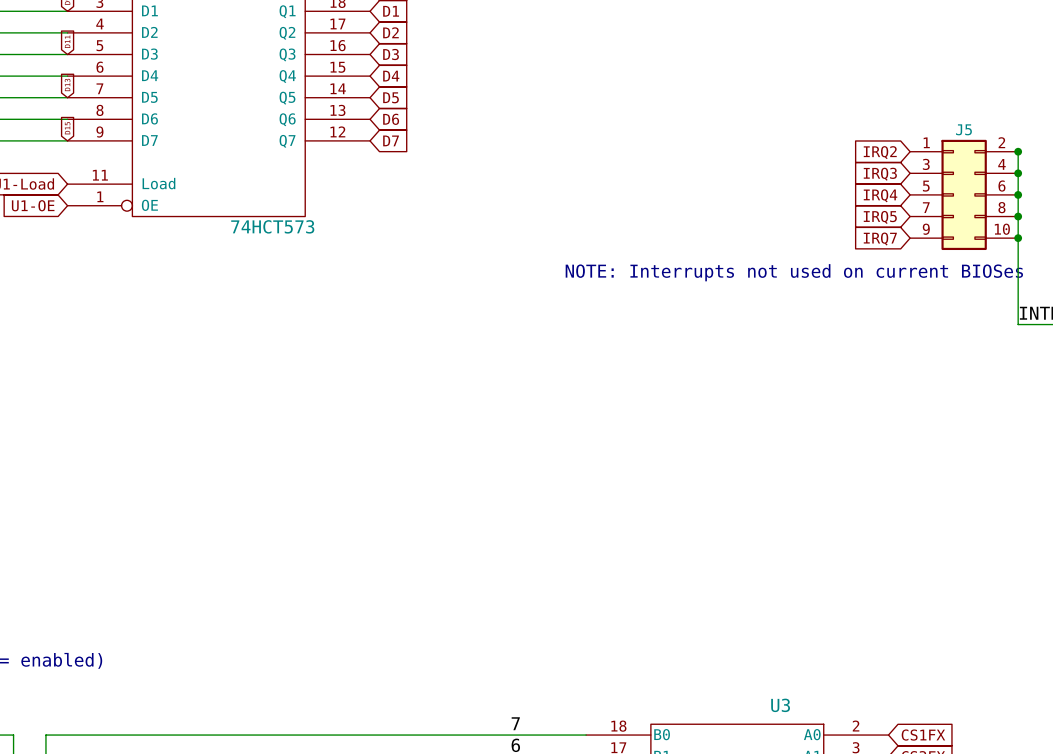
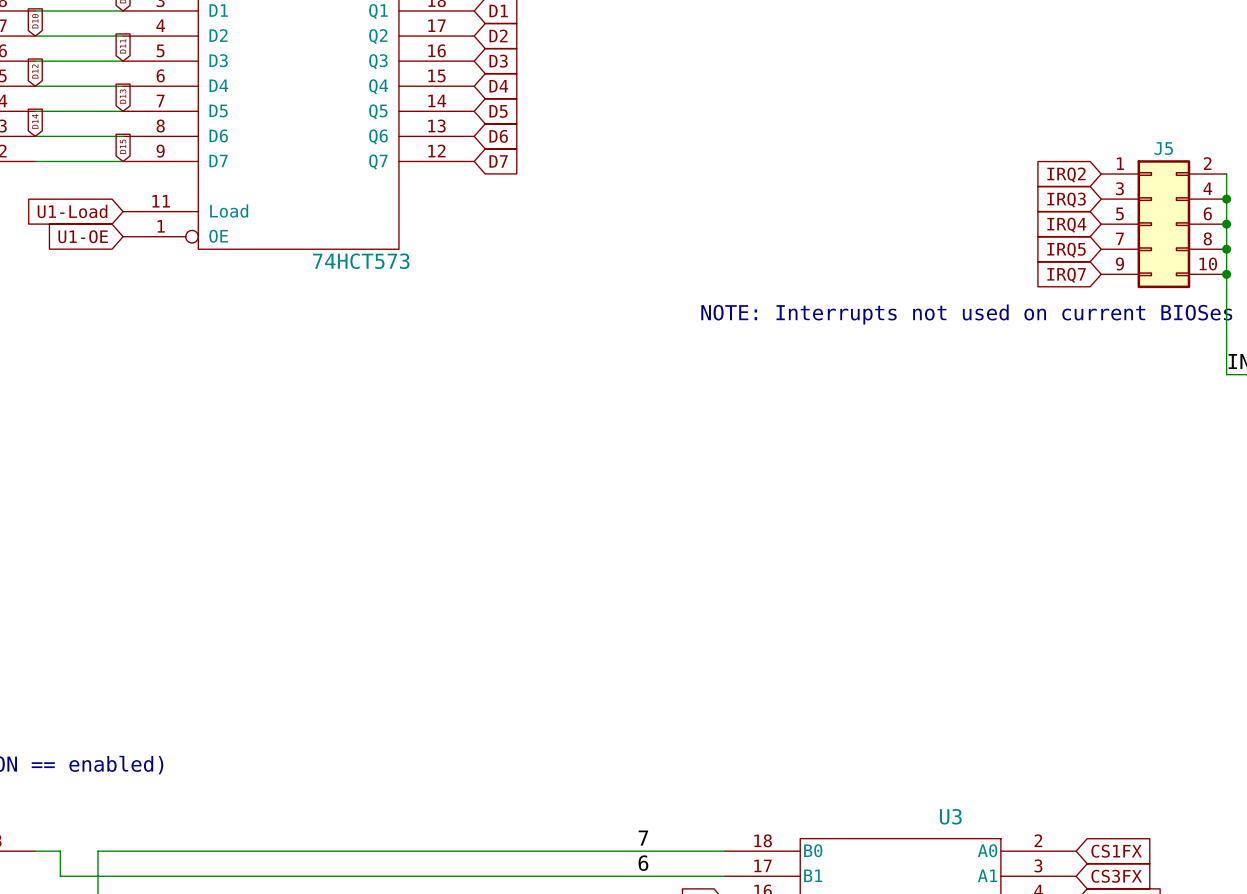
junction: (1018, 151) -> none

